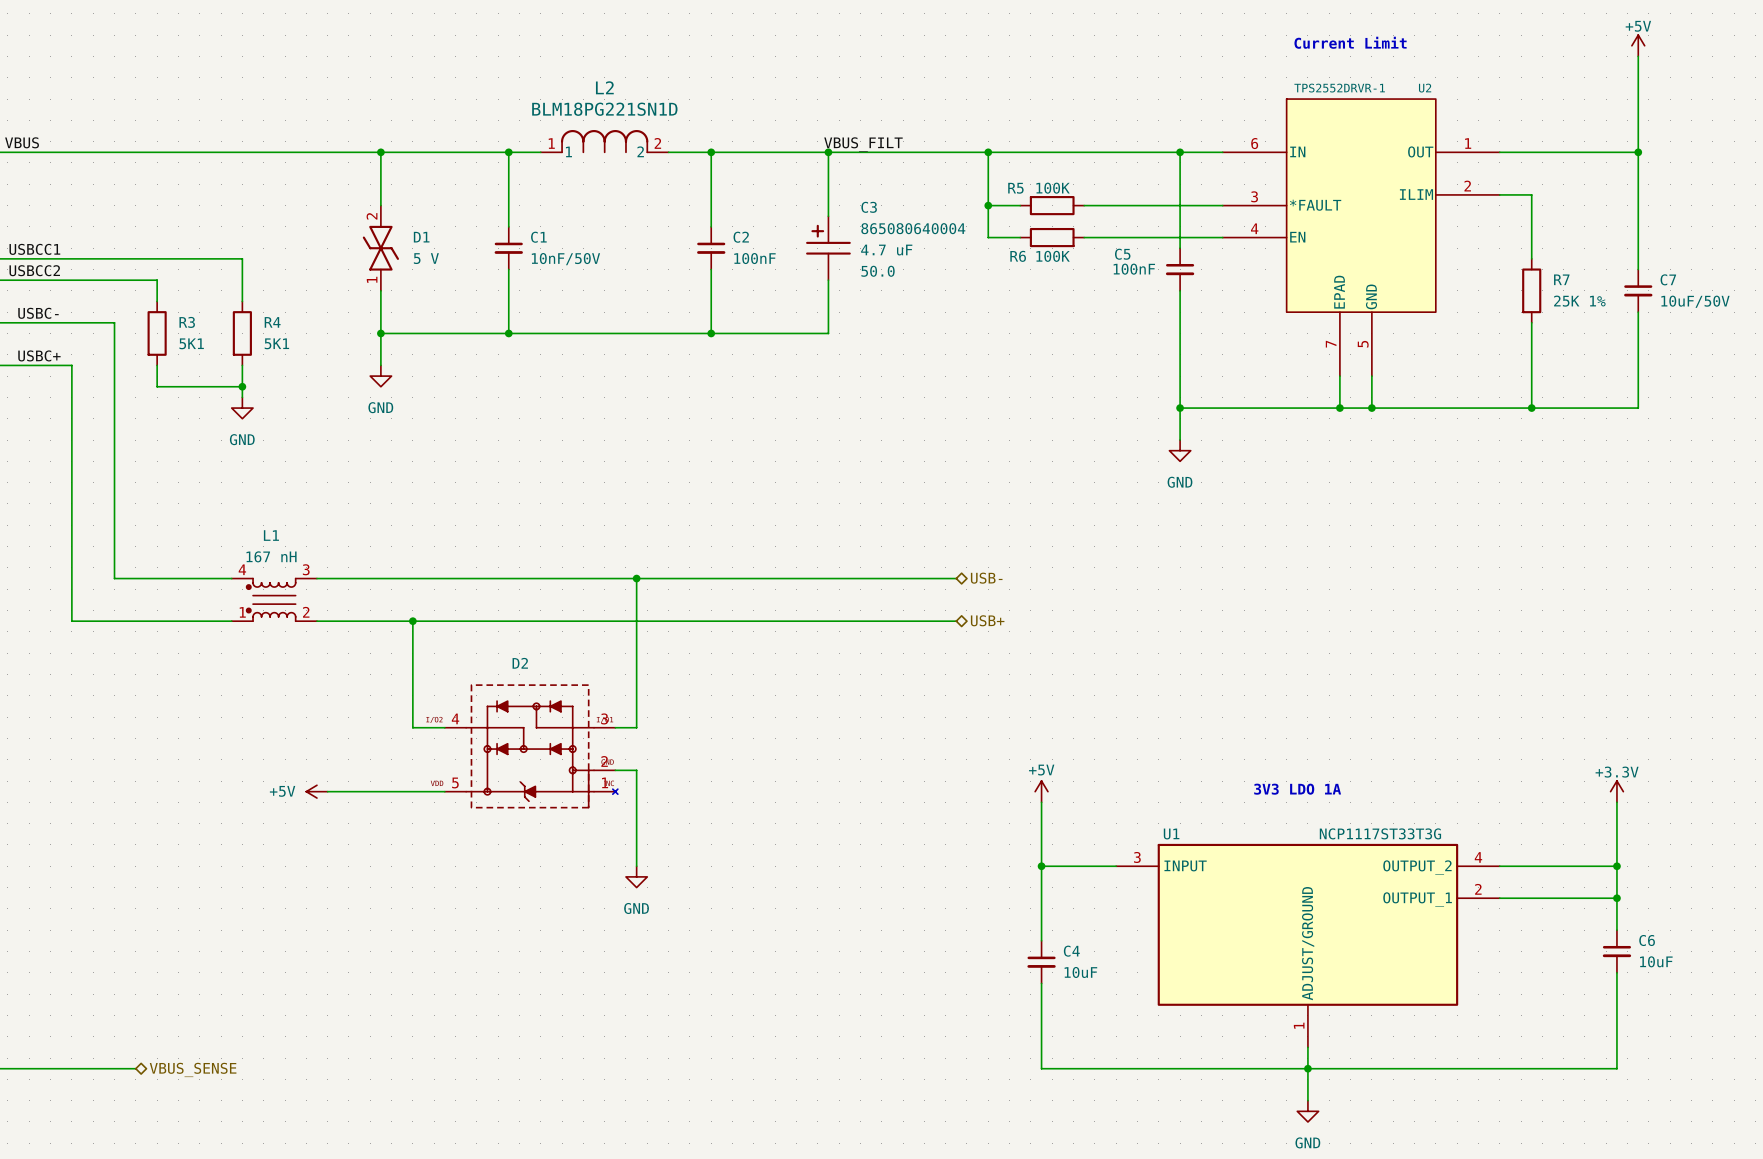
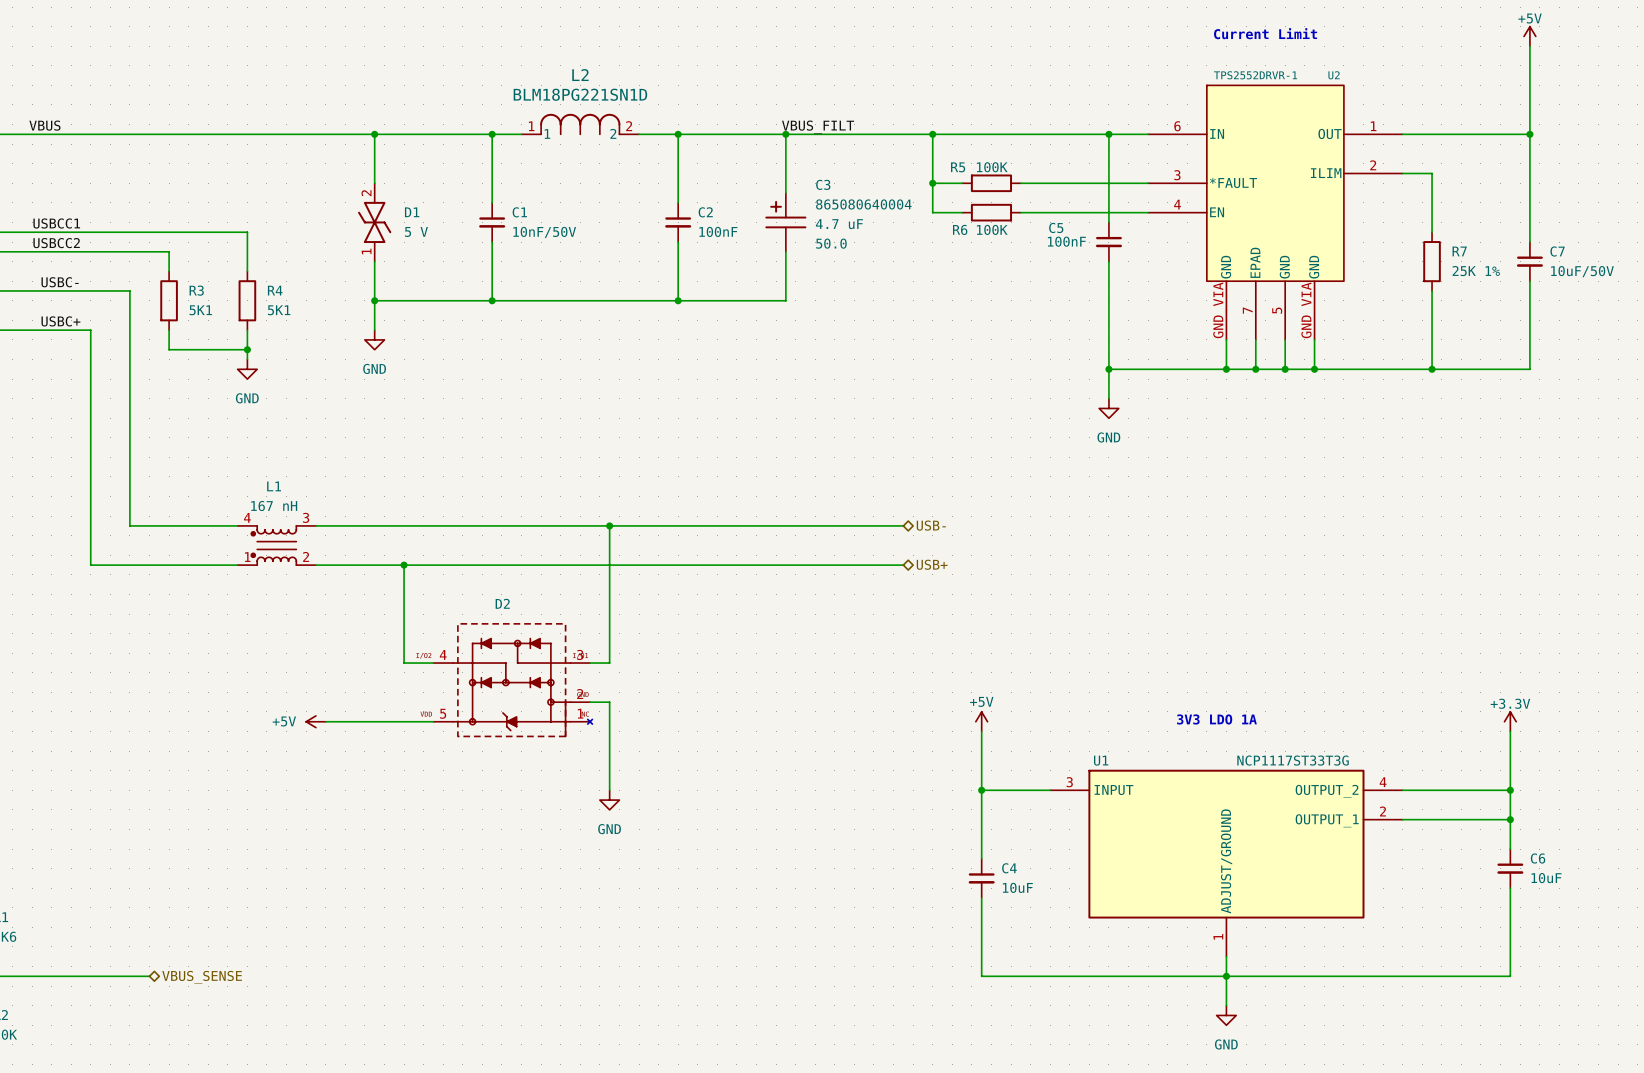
U2 symbol: [1222, 99, 1500, 377] -> [1148, 85, 1403, 340]
wire: none -> (1226, 339) (1226, 369)
wire: none -> (1314, 339) (1314, 369)
junction: none -> (1226, 369)
junction: none -> (1314, 369)

